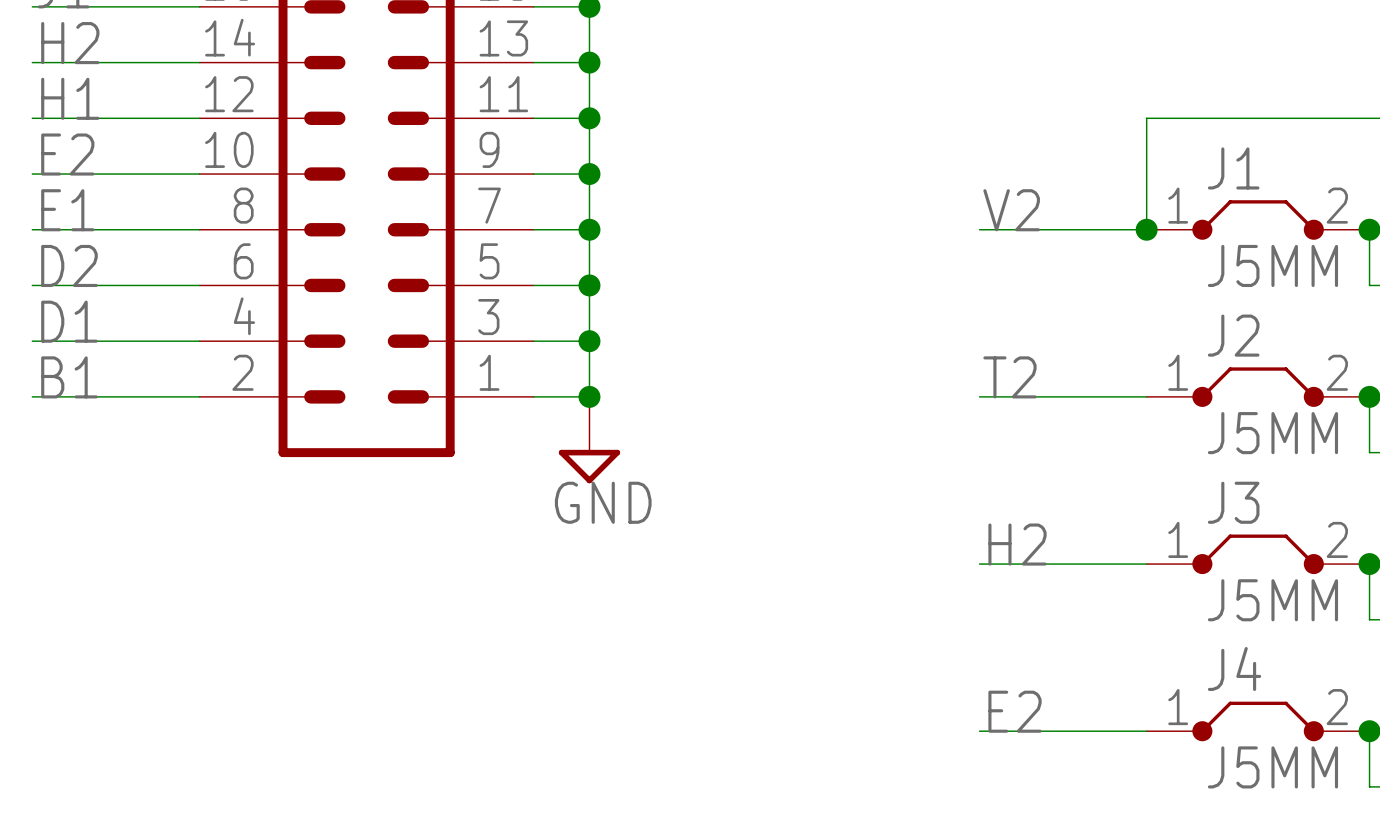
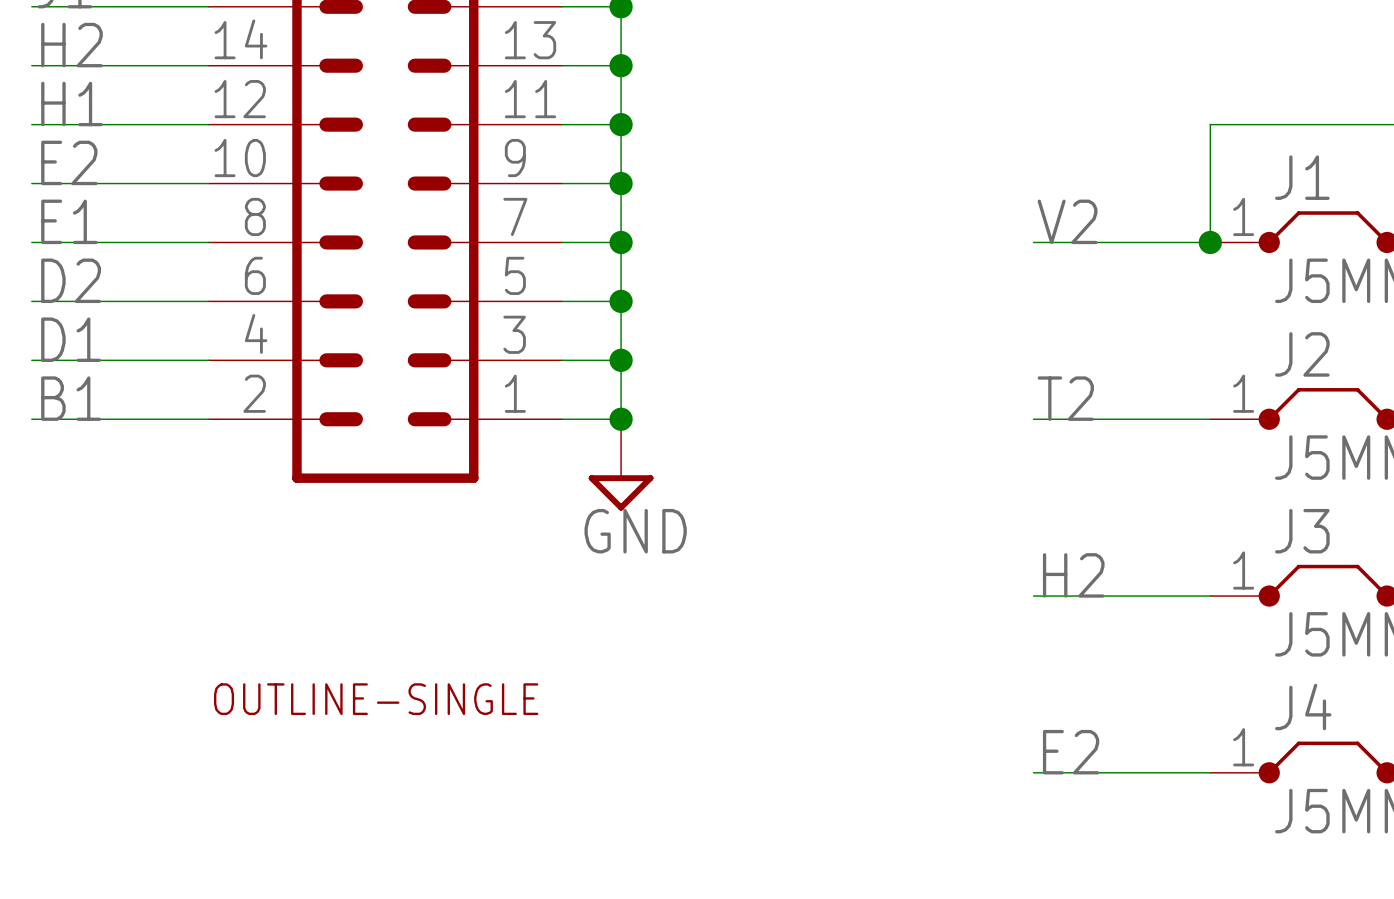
part: none -> OUTLINE-SINGLE (376, 699)

